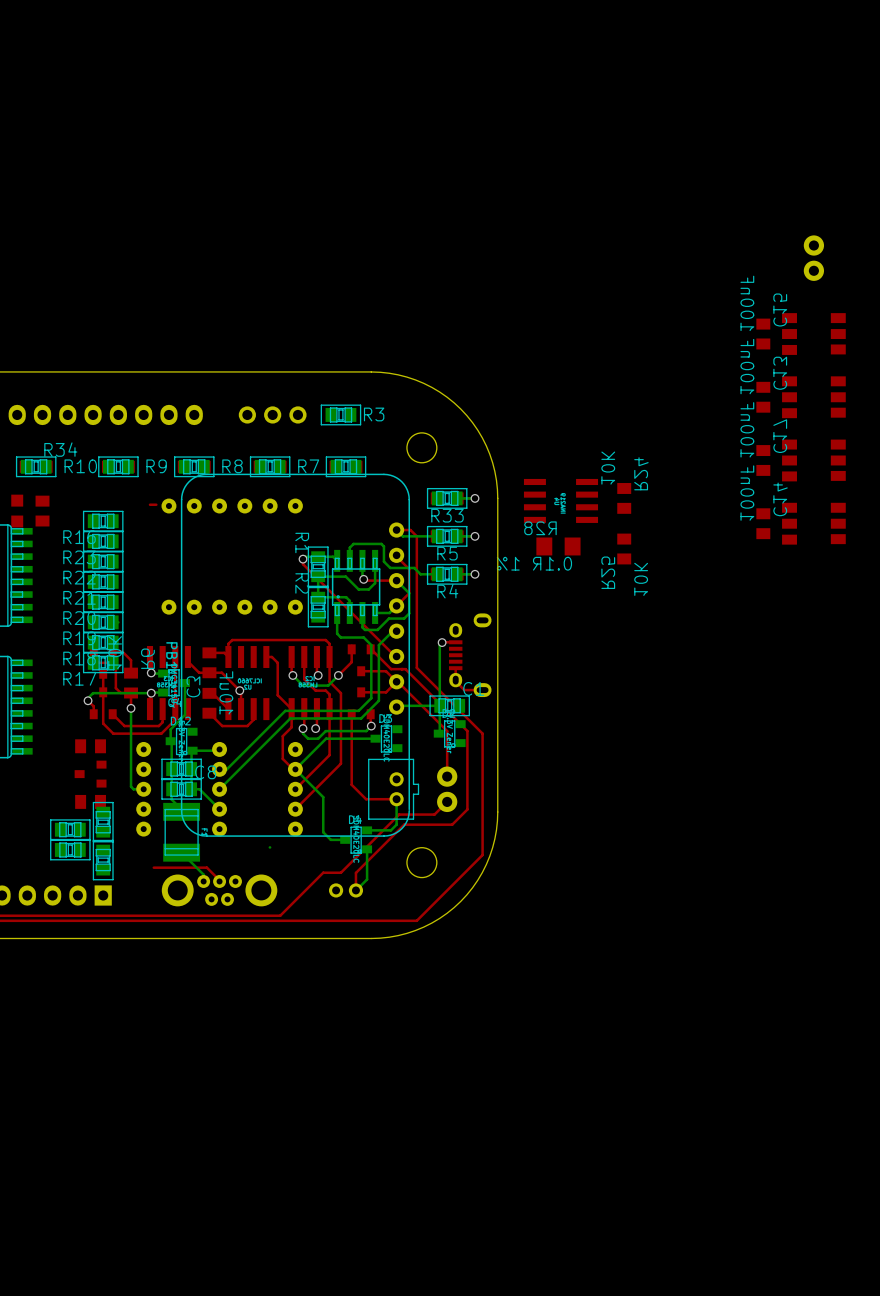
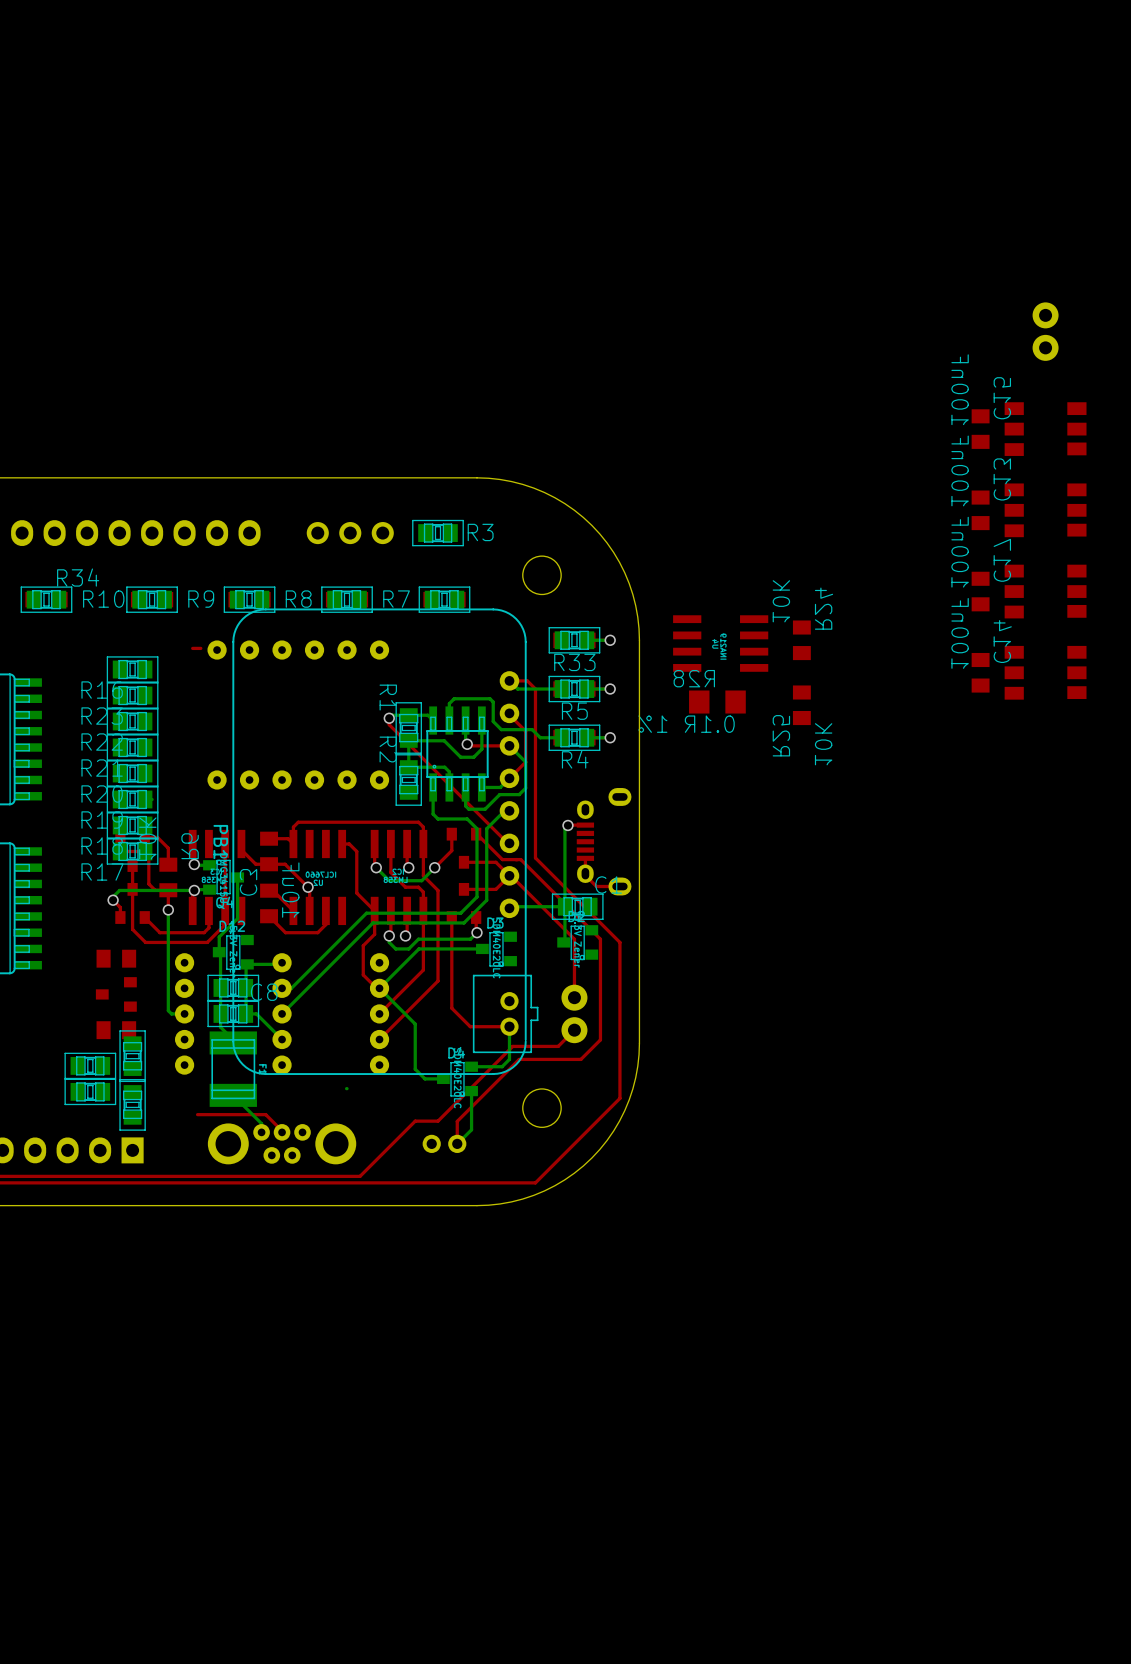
part: (17, 511) -> none
part: (42, 511) -> none

